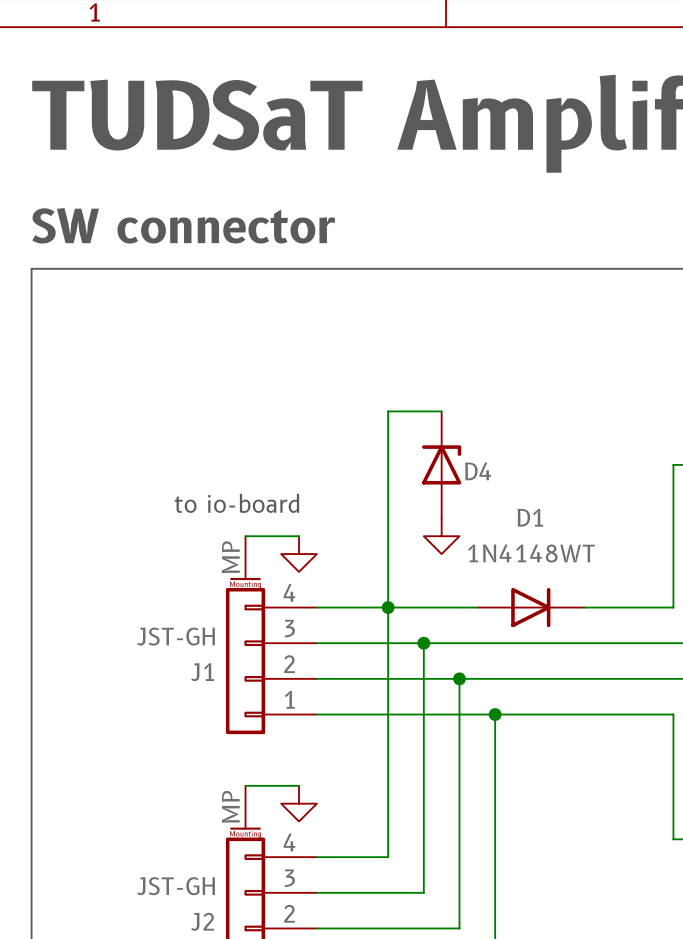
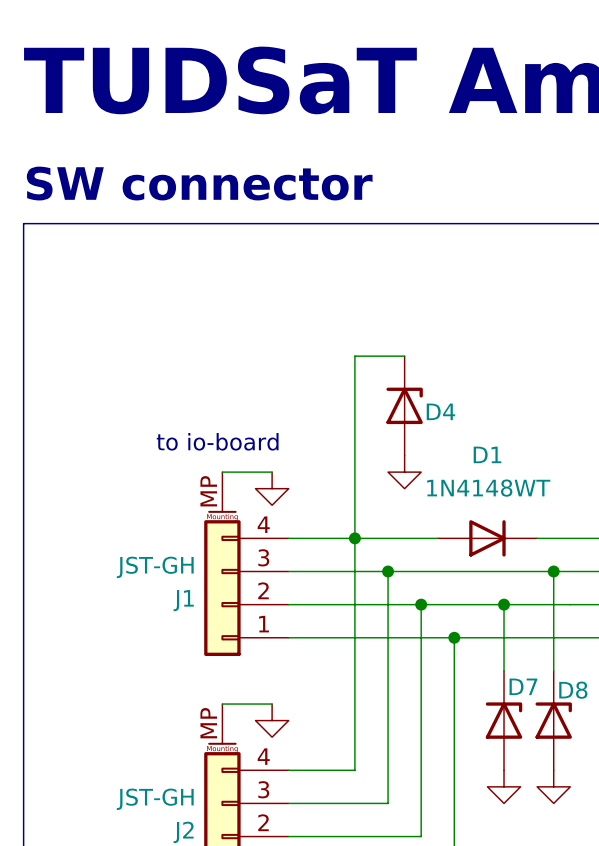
wire: none -> (553, 571) (553, 670)
junction: none -> (553, 571)
wire: none -> (504, 604) (504, 670)
junction: none -> (504, 604)
D7: none -> (504, 720)
D8: none -> (553, 720)
power symbol: none -> (504, 786)
power symbol: none -> (553, 786)

